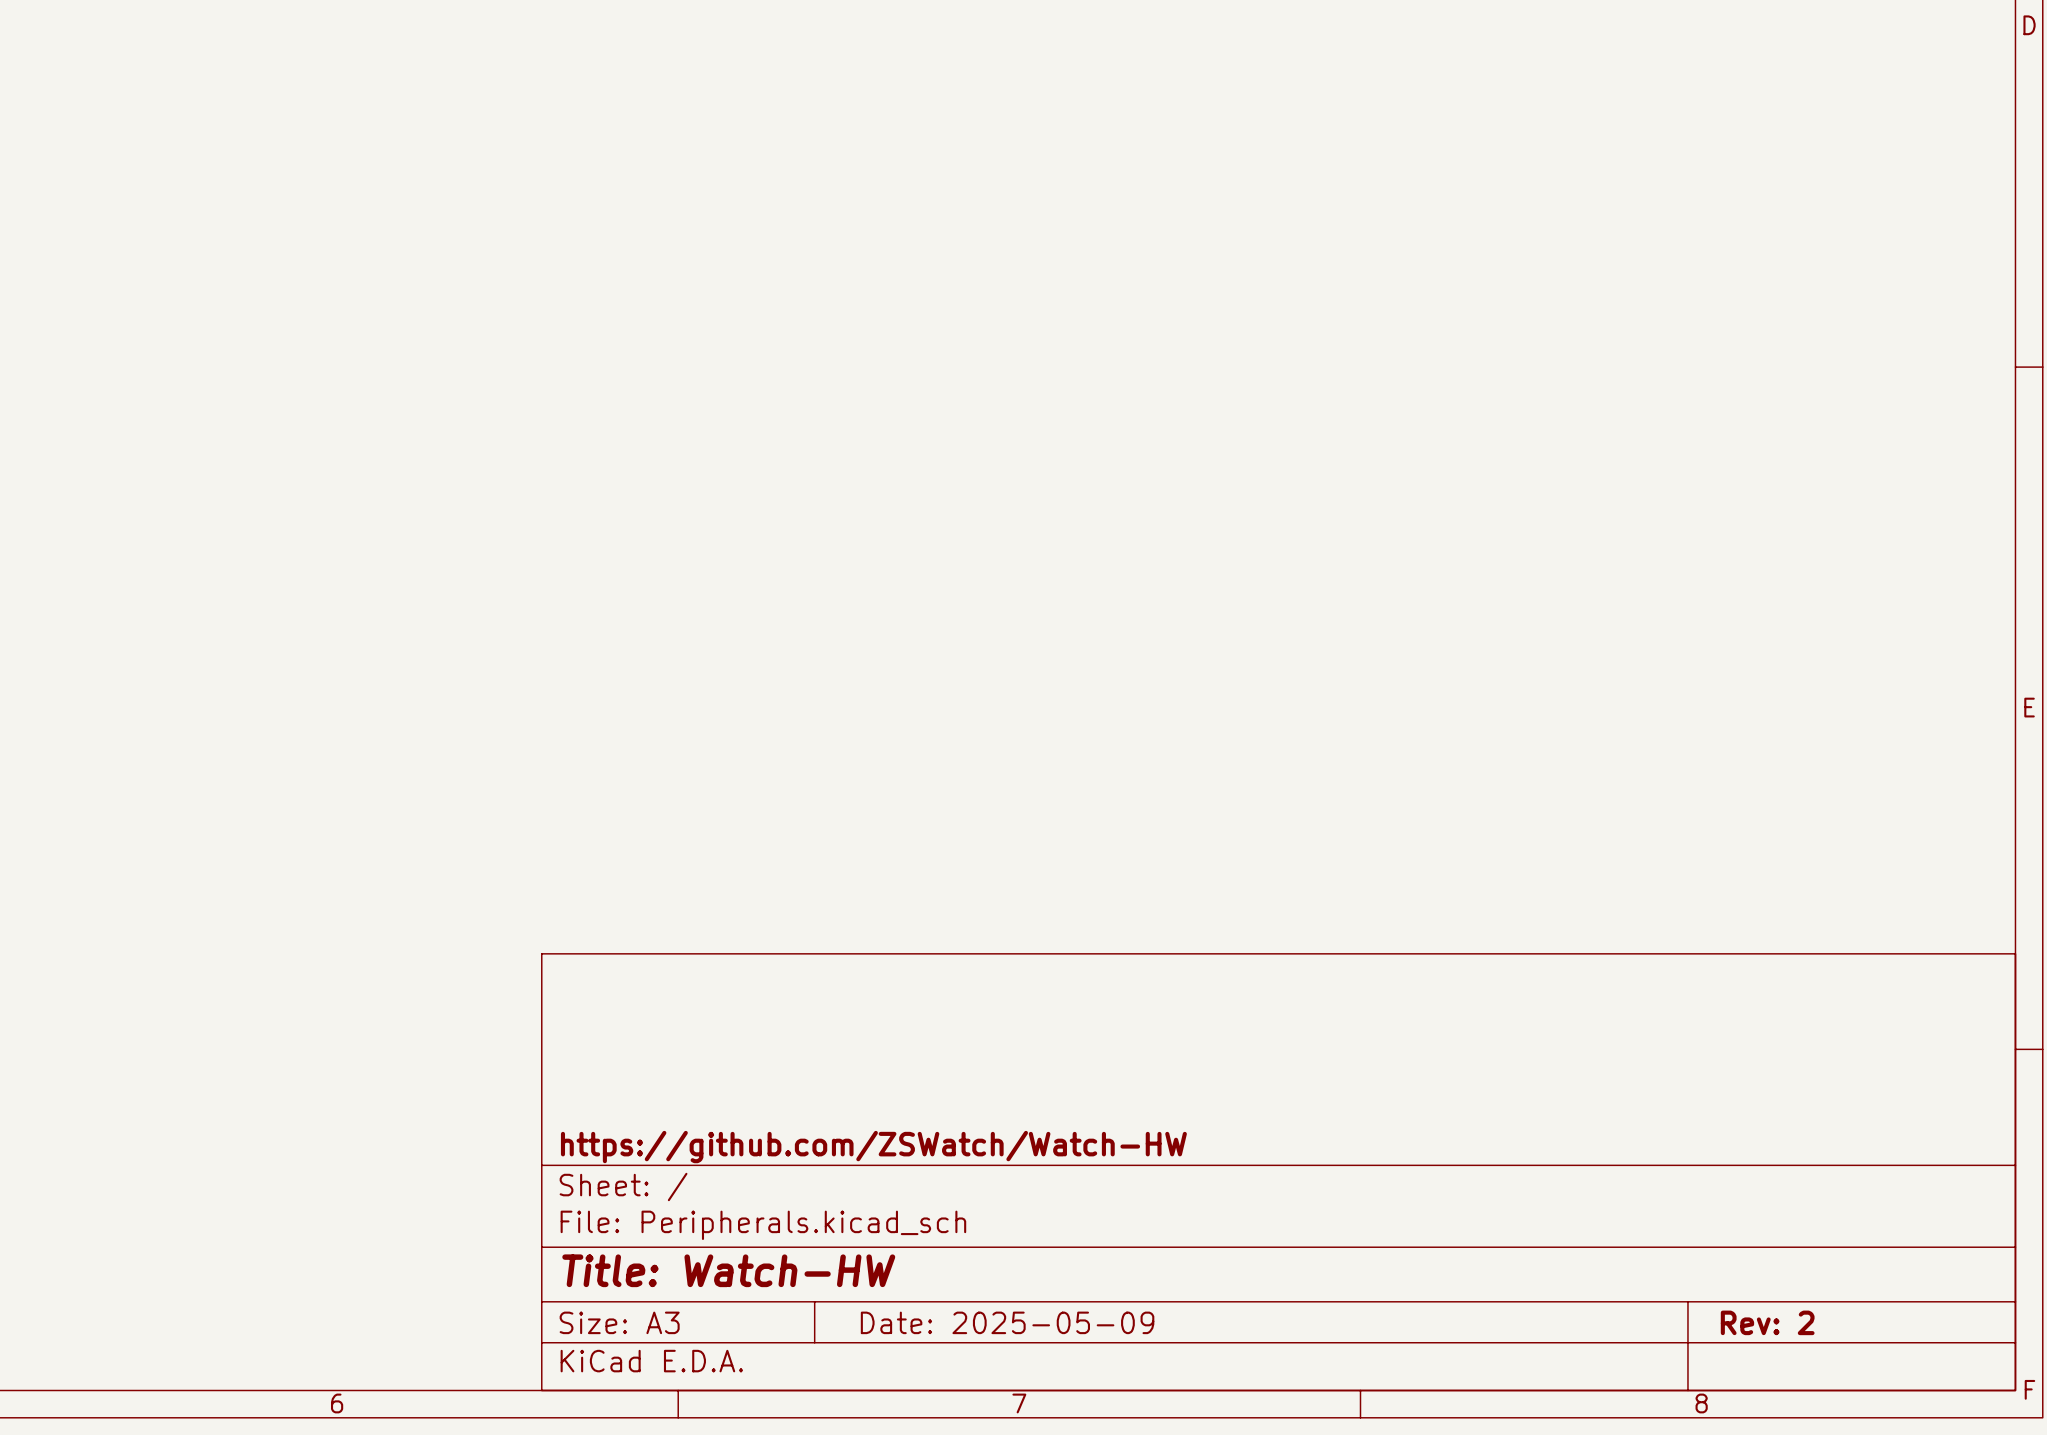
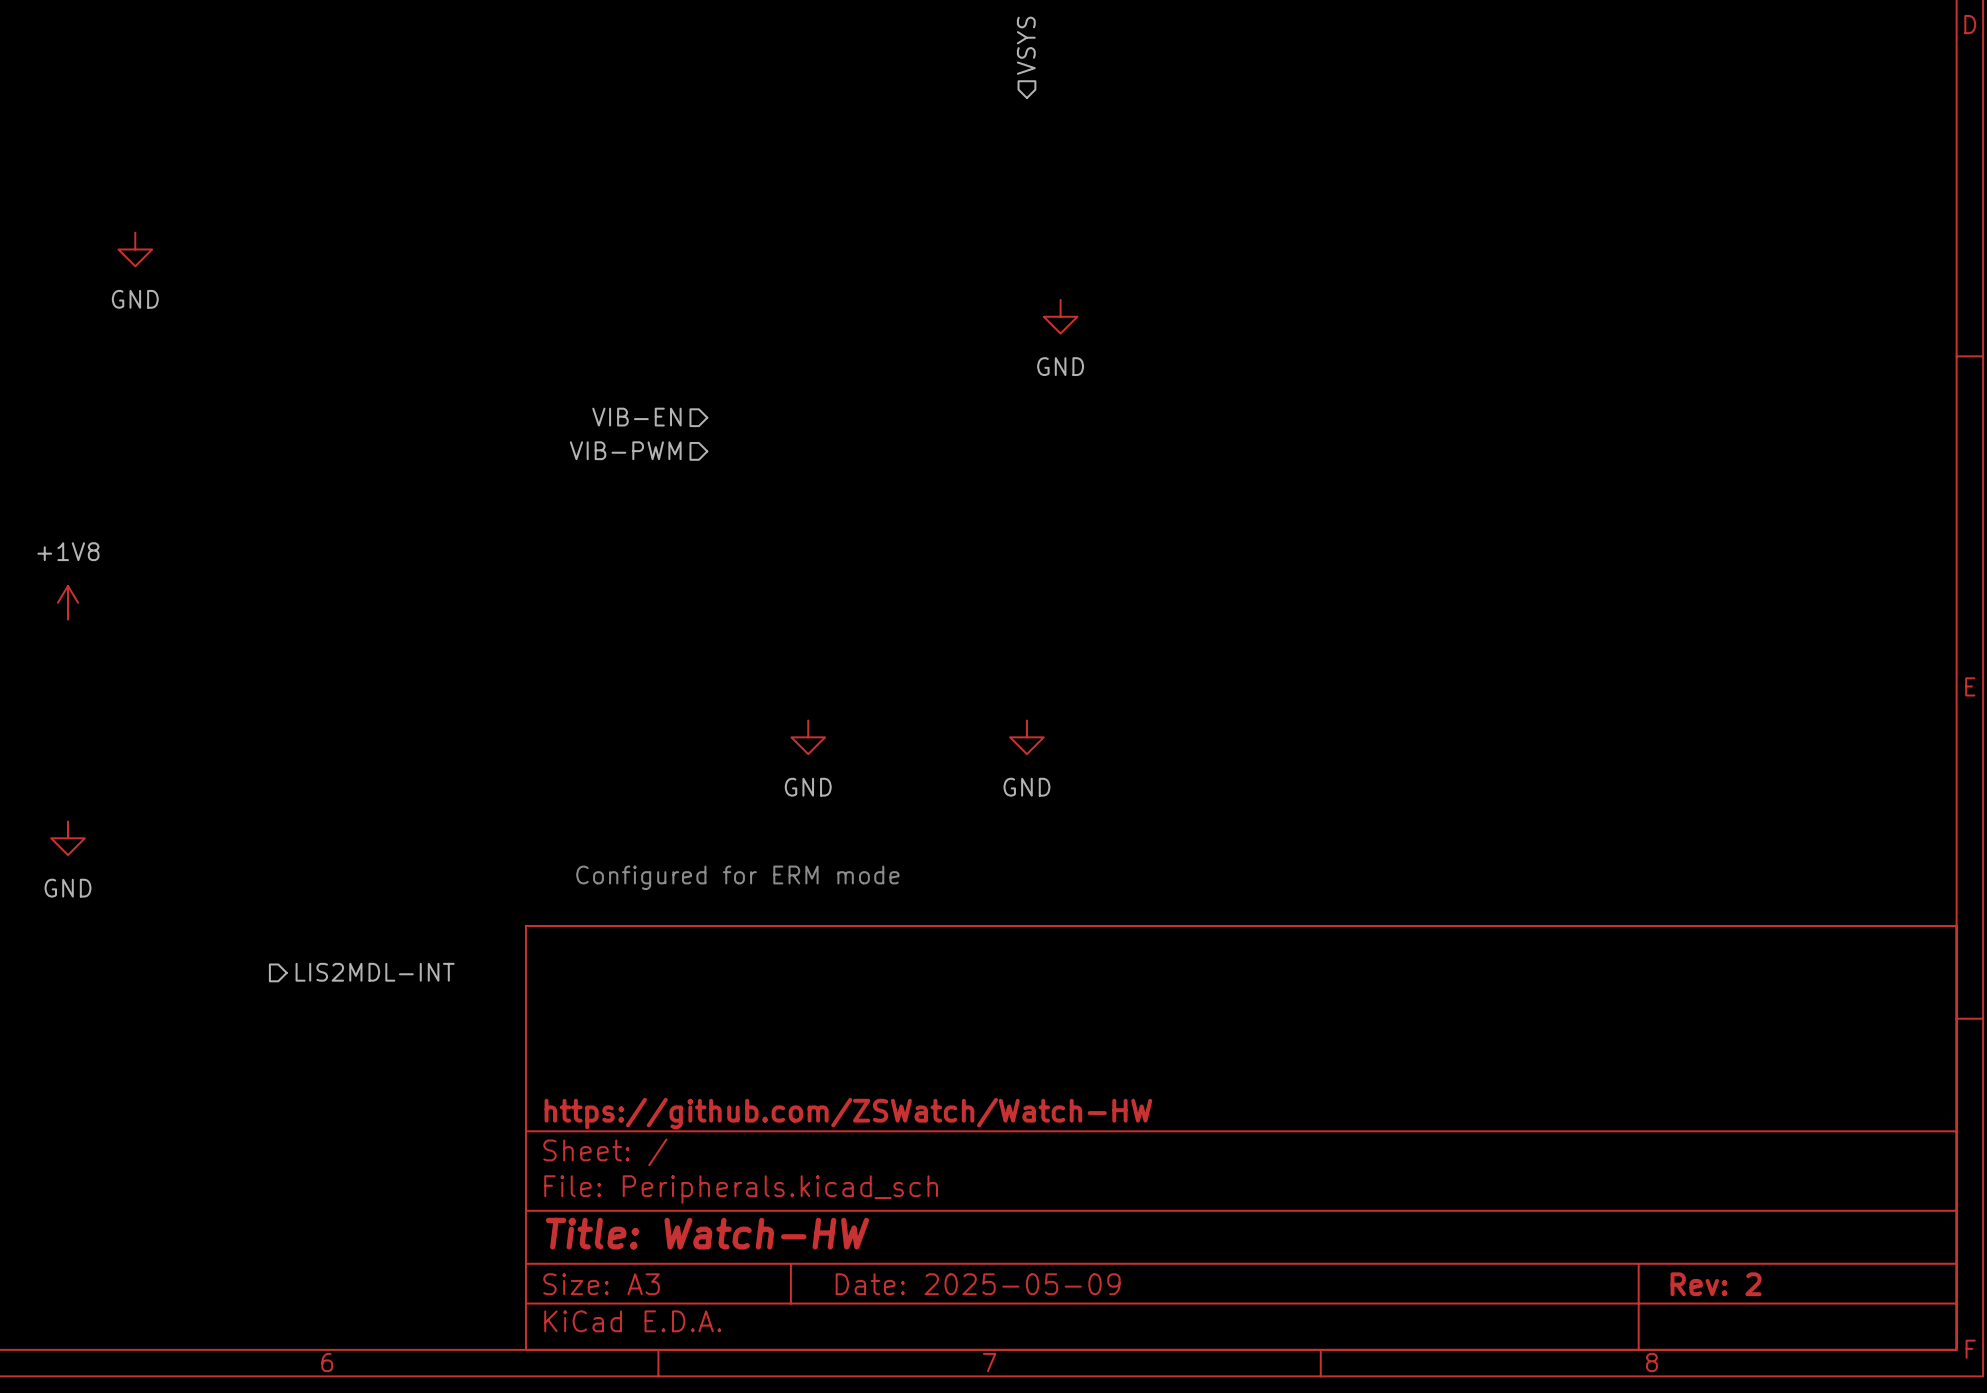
hierarchical label: none -> VSYS (1026, 45)
power symbol: none -> GND (135, 249)
power symbol: none -> GND (1060, 316)
hierarchical label: none -> VIB-EN (636, 417)
hierarchical label: none -> VIB-PWM (625, 450)
power symbol: none -> +1V8 (68, 602)
power symbol: none -> GND (808, 737)
power symbol: none -> GND (1026, 737)
power symbol: none -> GND (68, 838)
text: none -> Configured for ERM mode (737, 877)
hierarchical label: none -> LIS2MDL-INT (375, 972)

